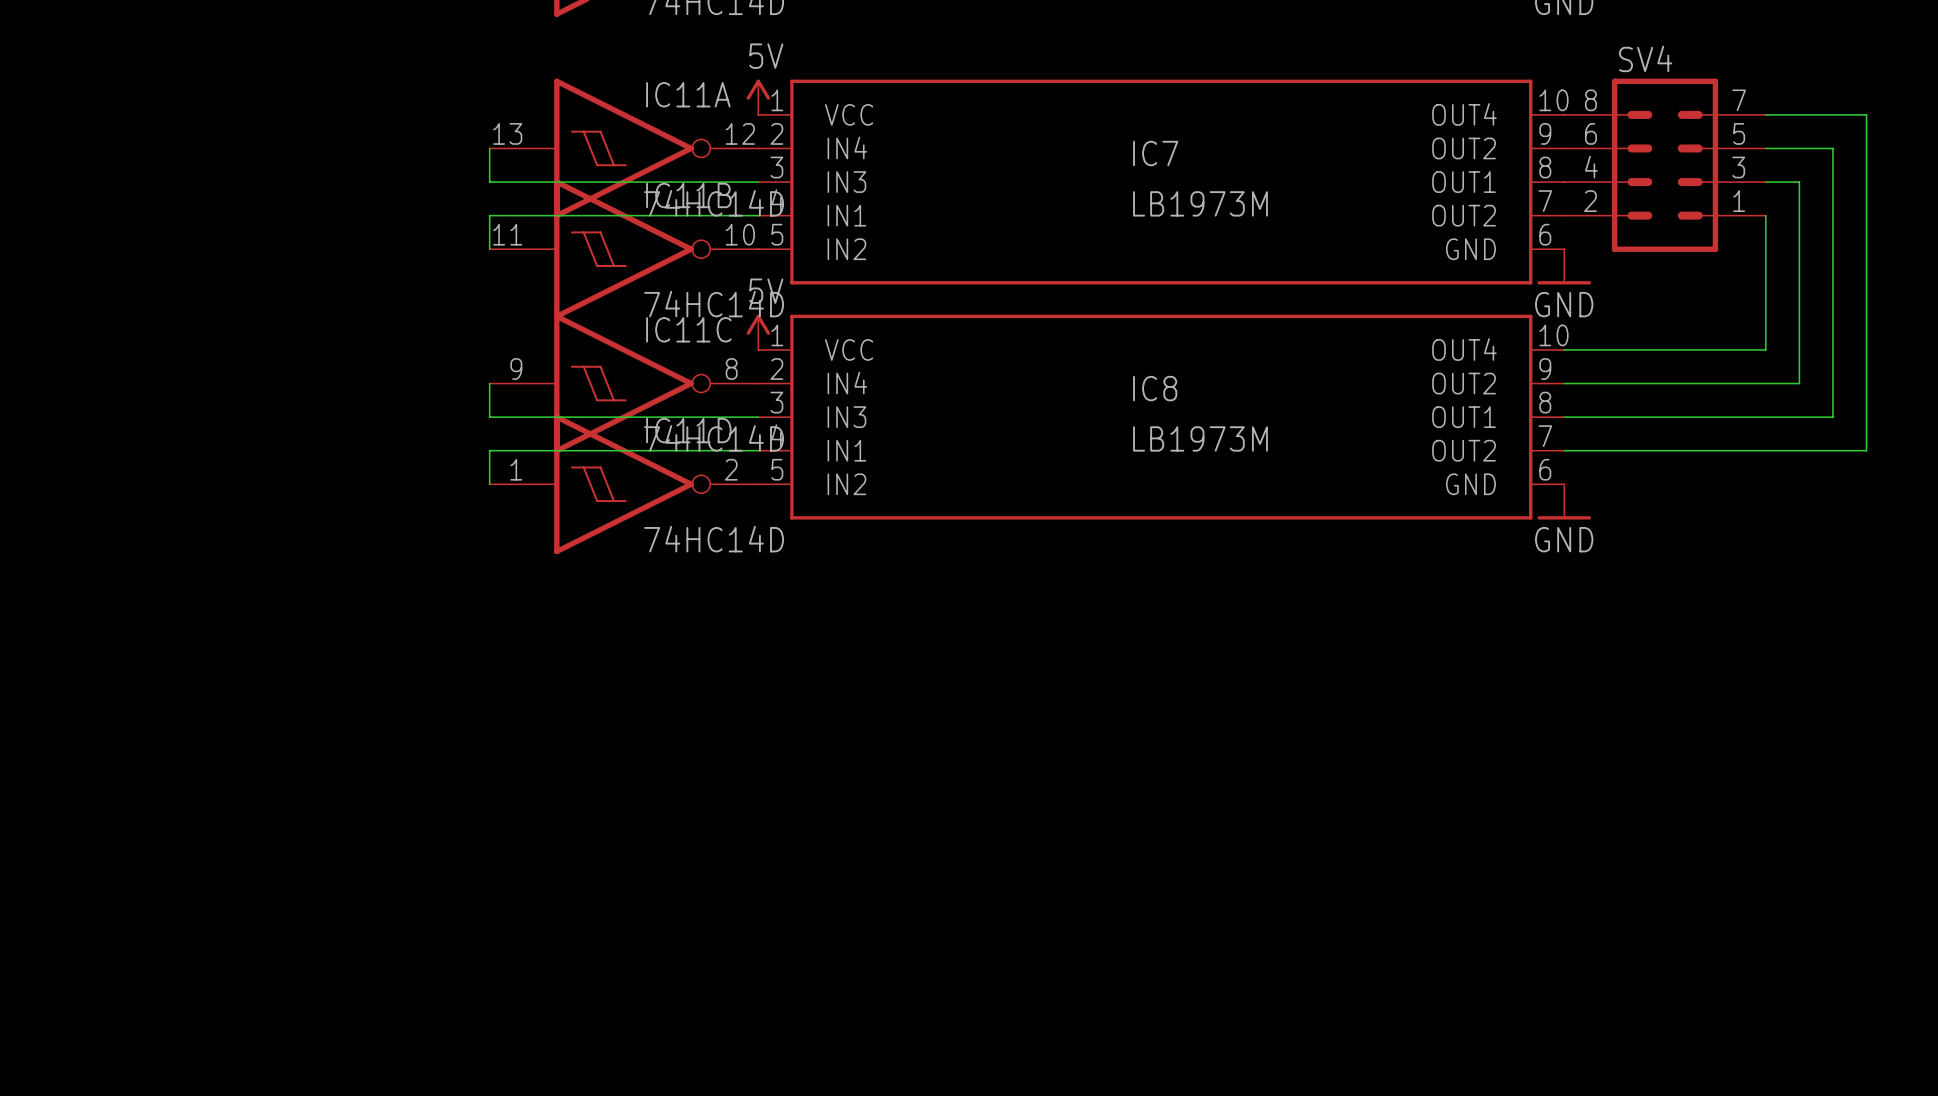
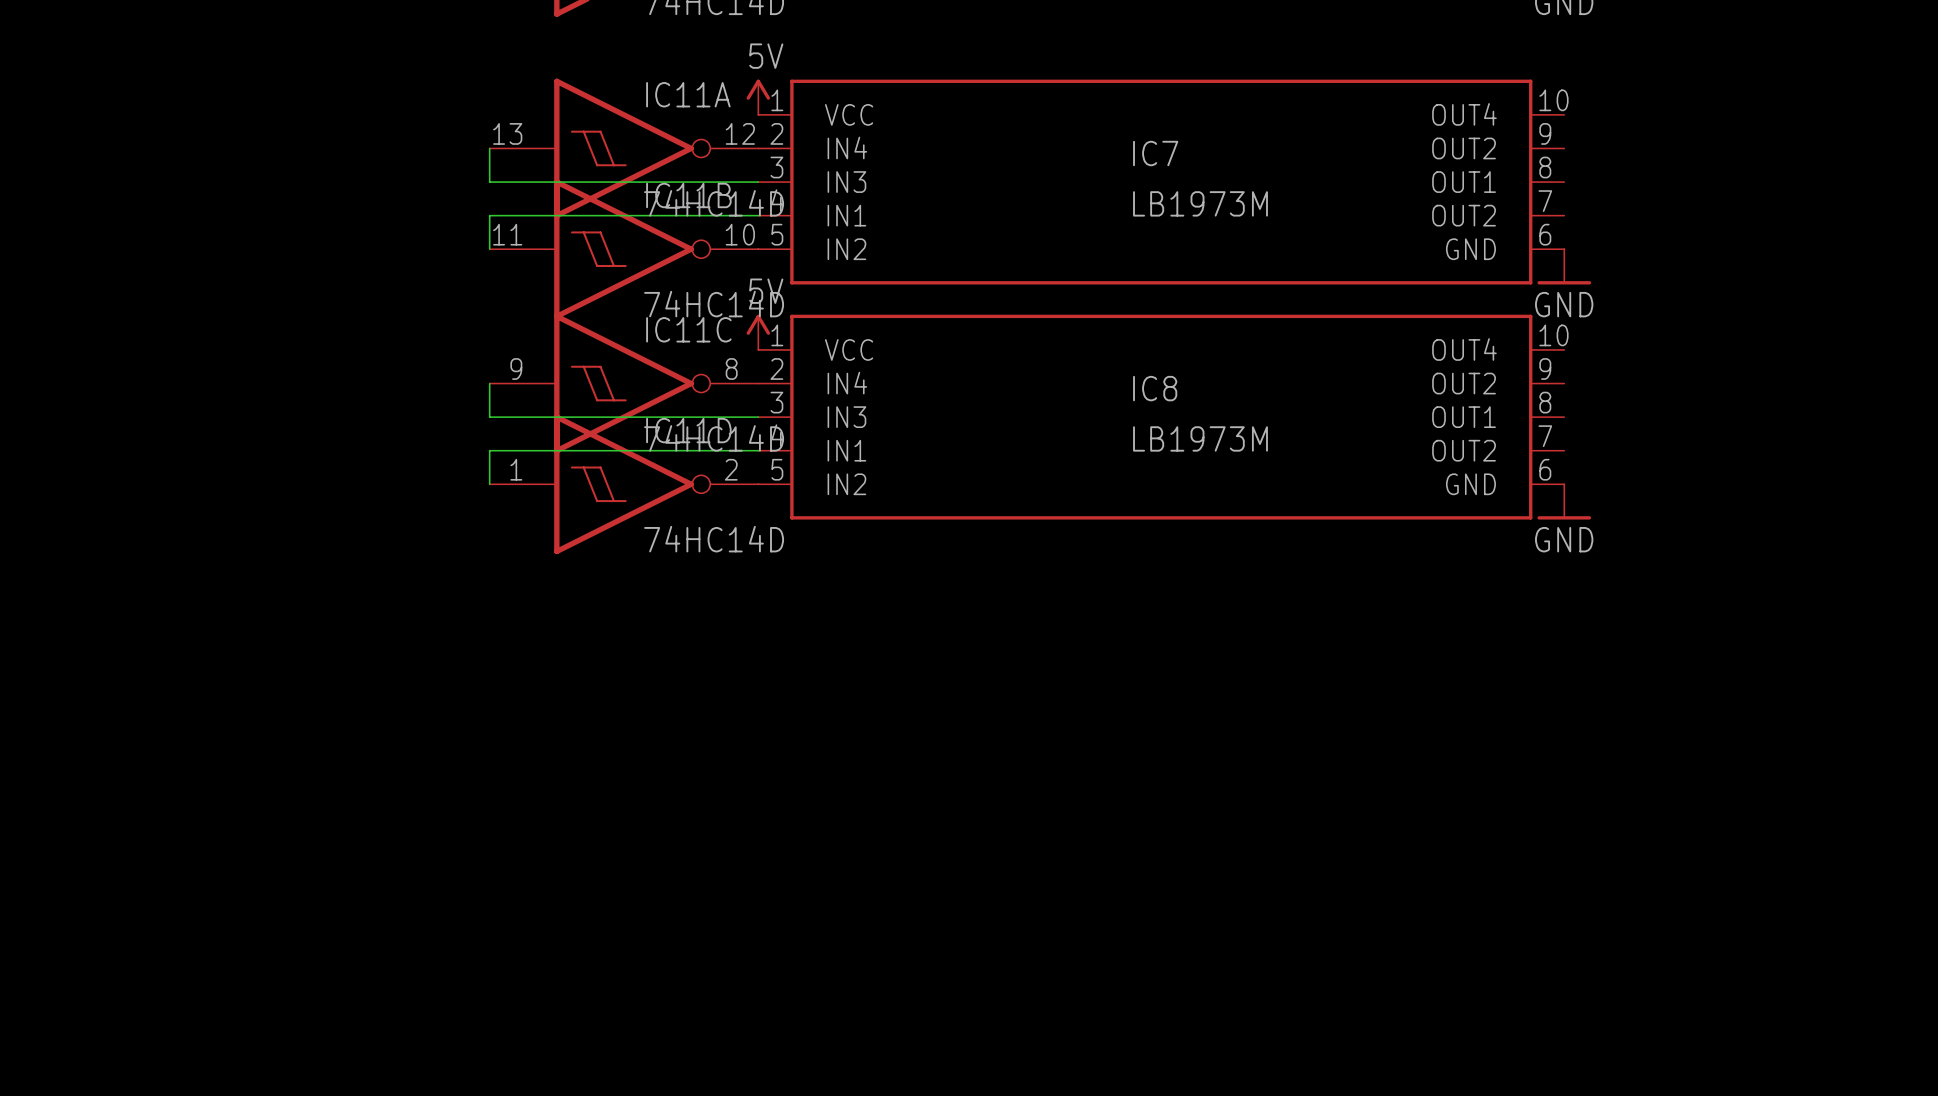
wire: (1765, 114) (1866, 114) (1866, 450) (1564, 450) -> none
wire: (1765, 148) (1832, 148) (1832, 417) (1564, 417) -> none
SV4: (1665, 165) -> none
wire: (1765, 182) (1799, 182) (1799, 383) (1564, 383) -> none
wire: (1765, 215) (1765, 349) (1564, 349) -> none

